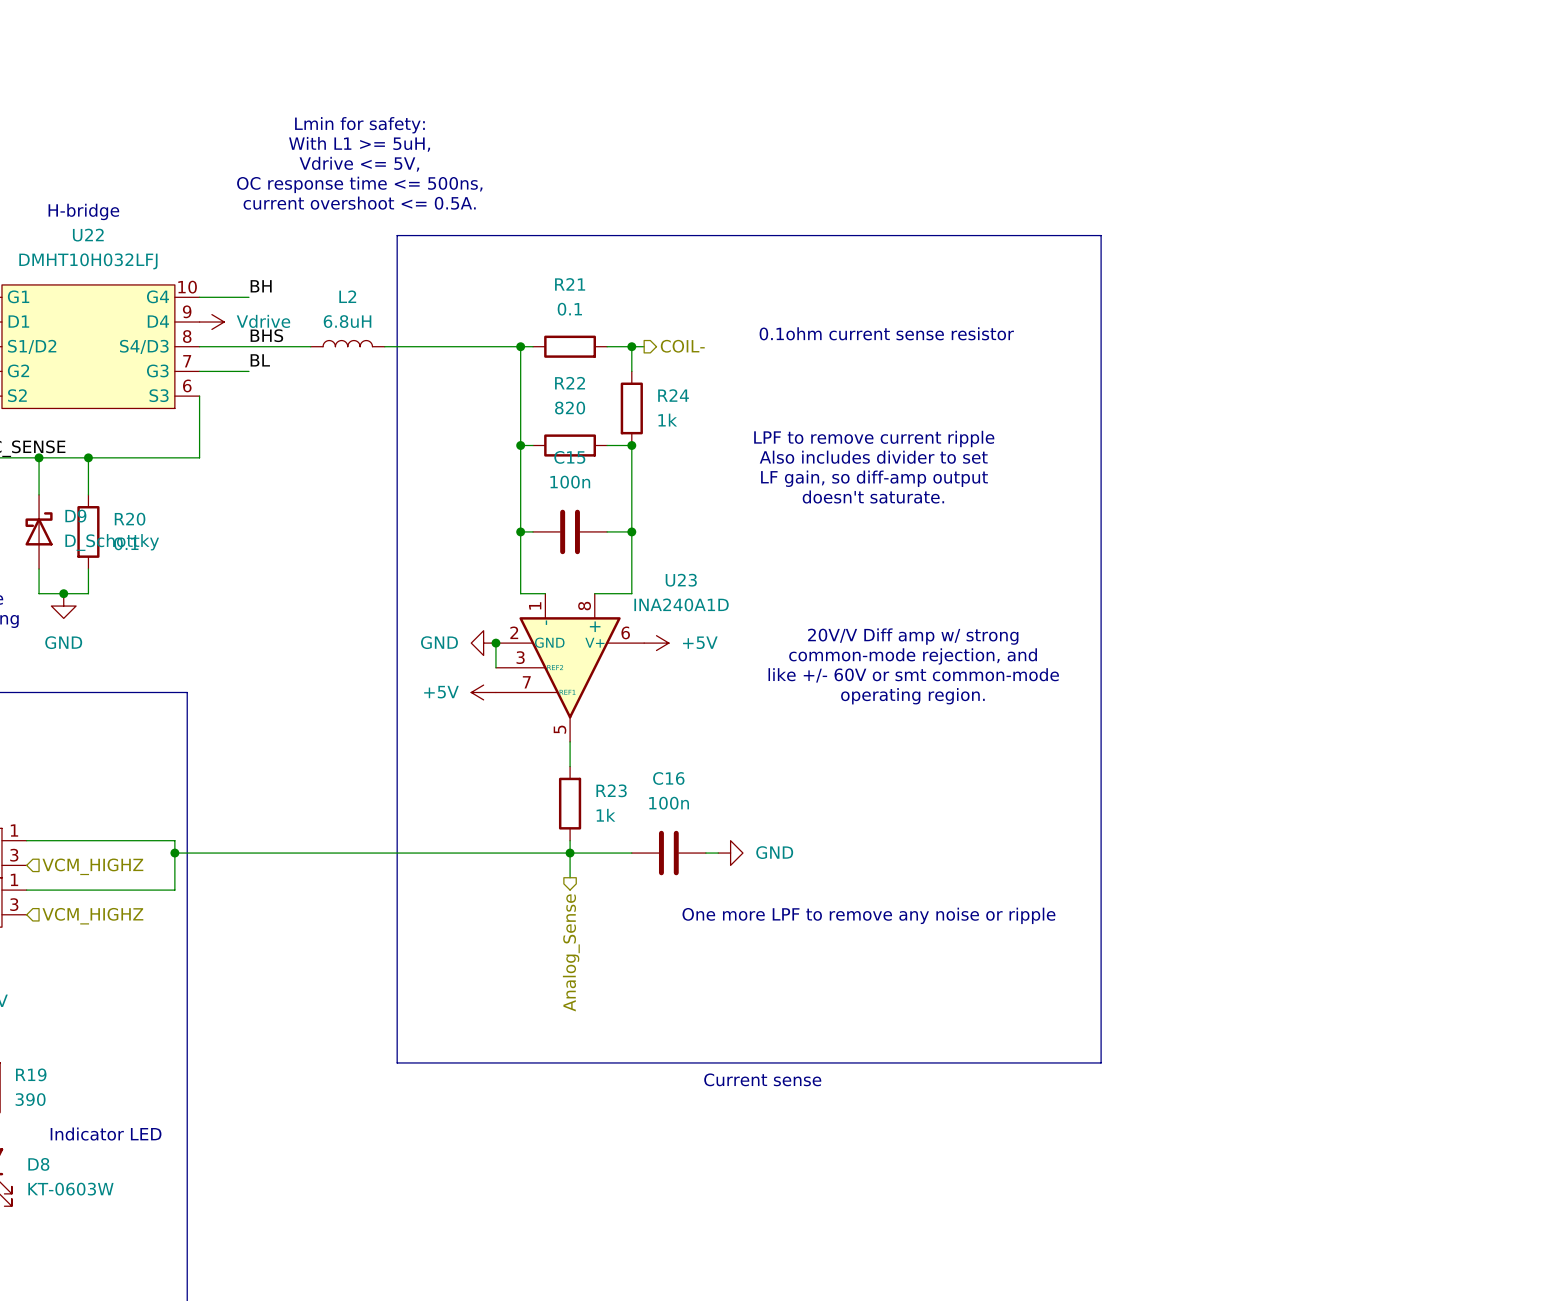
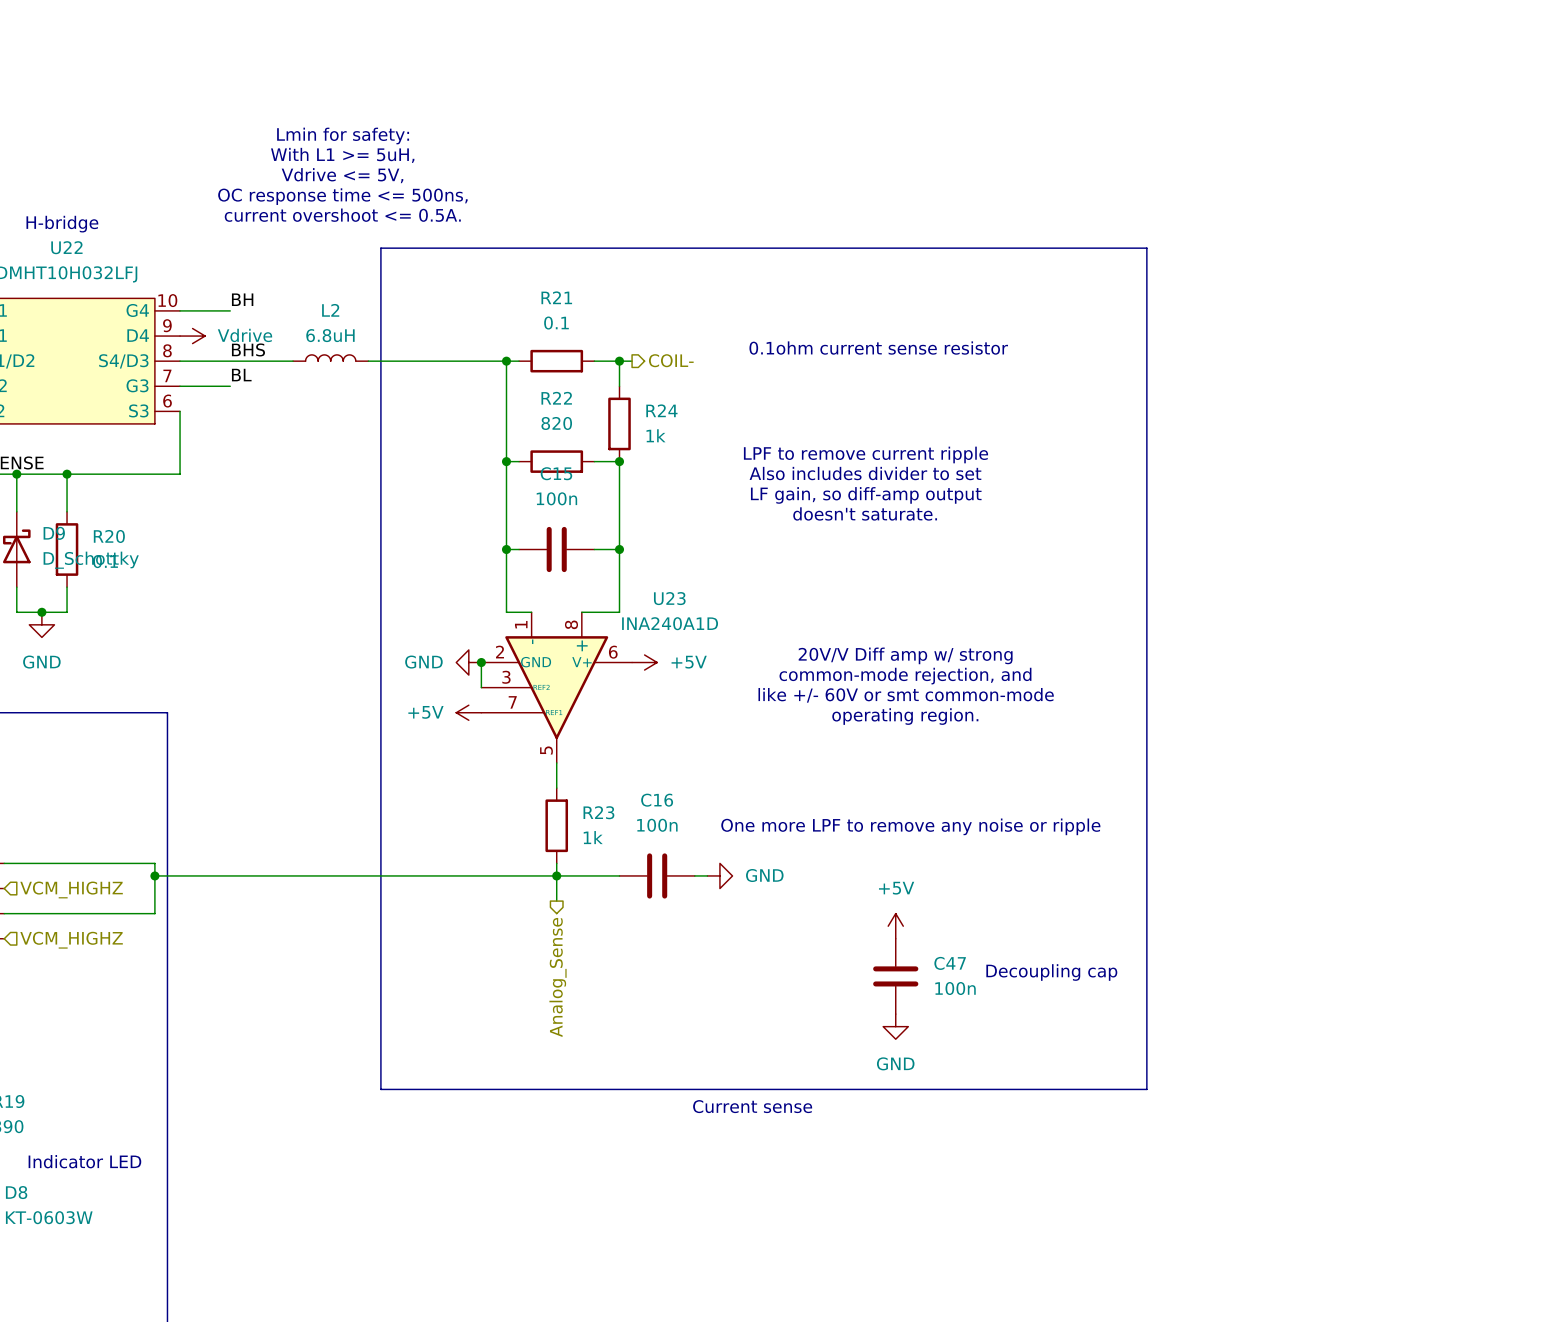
line: (1101, 235) (1101, 1062) -> (1096, 248) (1146, 248) (1146, 1089) (1096, 1089)
power symbol: none -> +5V (895, 926)
text position: One more LPF to remove any noise or ripple (868, 915) -> One more LPF to remove any noise or ripple (910, 826)
text: none -> Decoupling cap (1051, 972)
C47: none -> 100n (895, 976)
power symbol: none -> GND (895, 1026)

